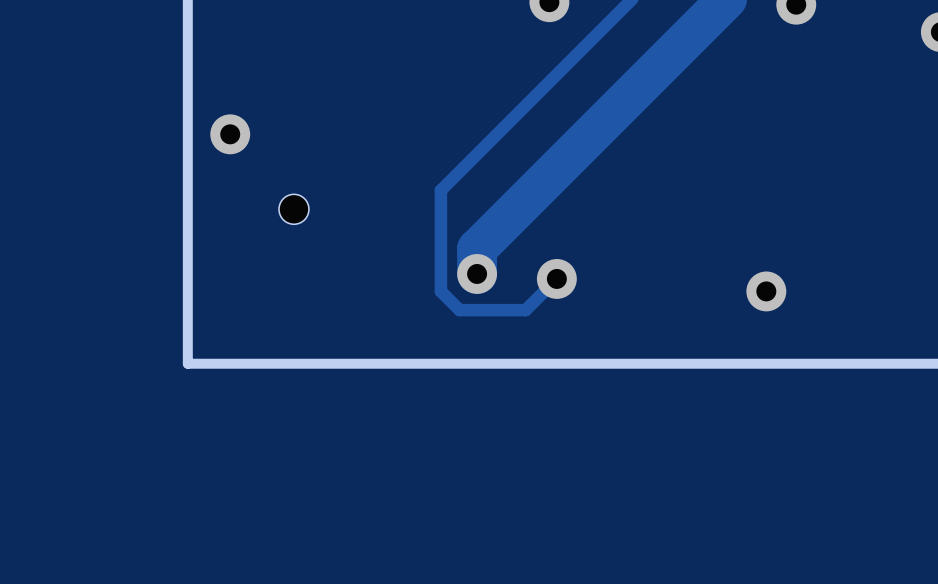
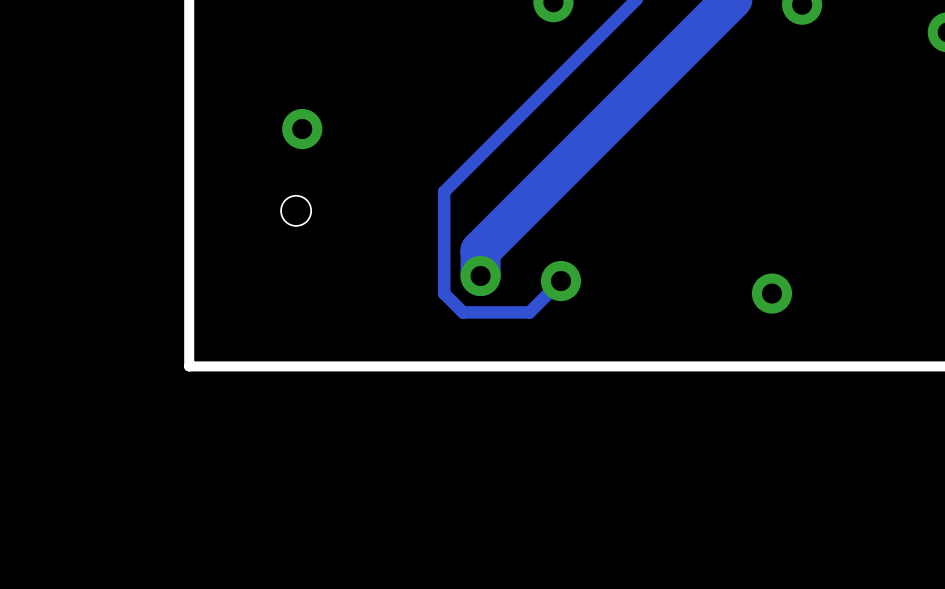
via position: (230, 134) -> (302, 129)

